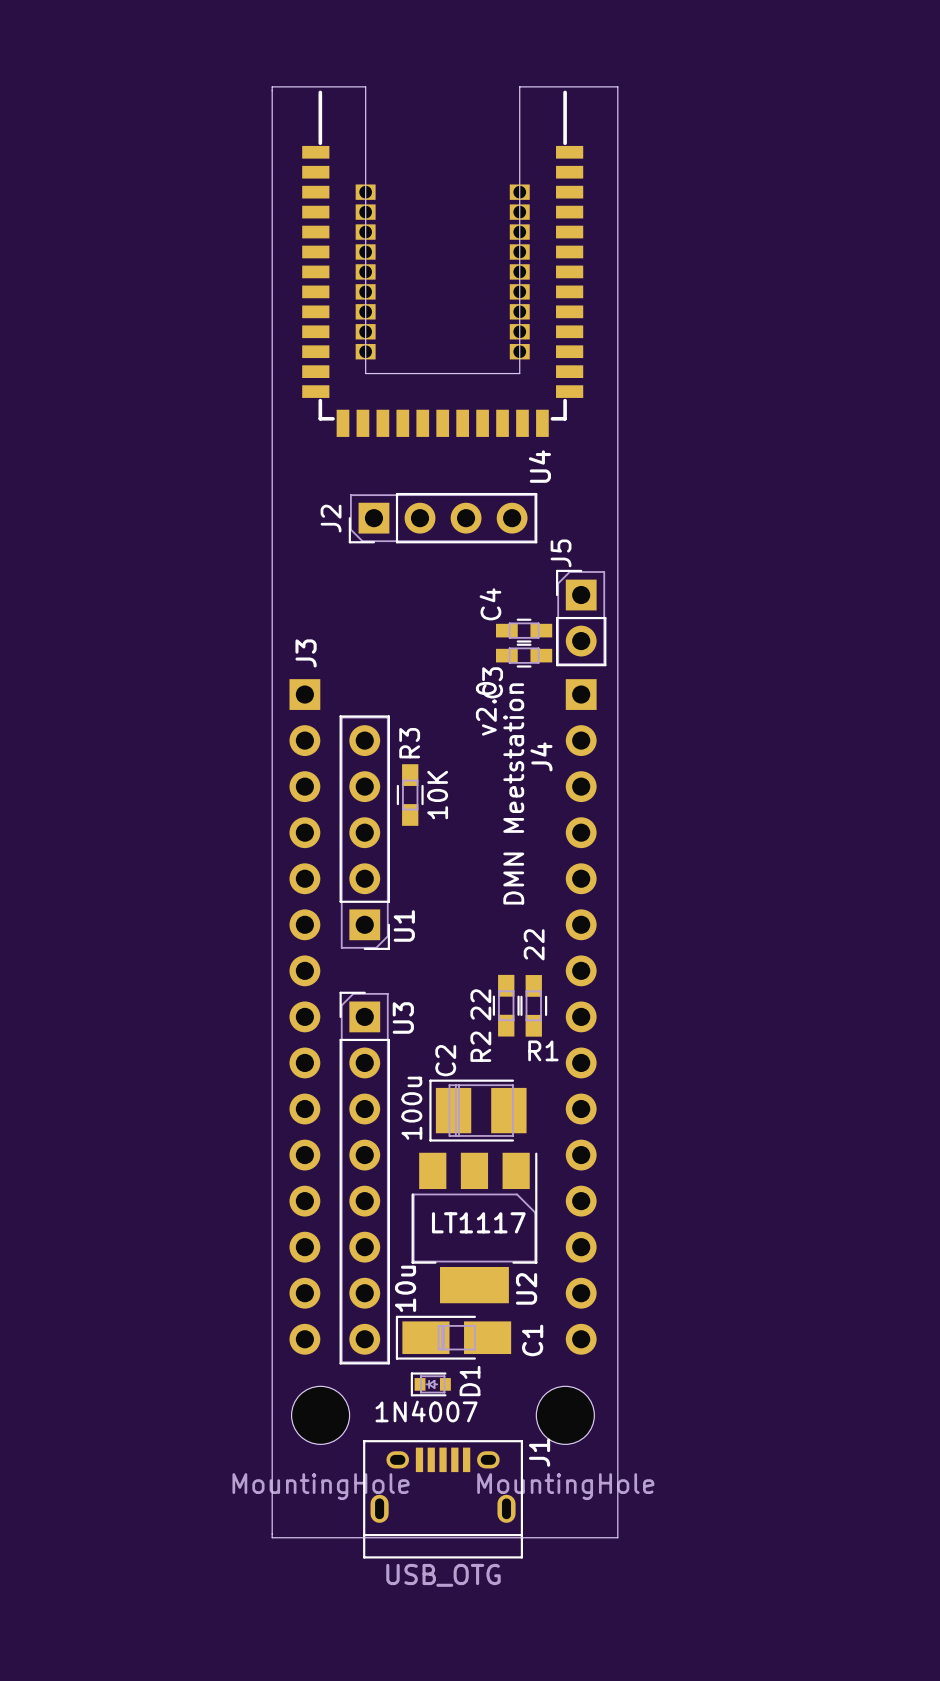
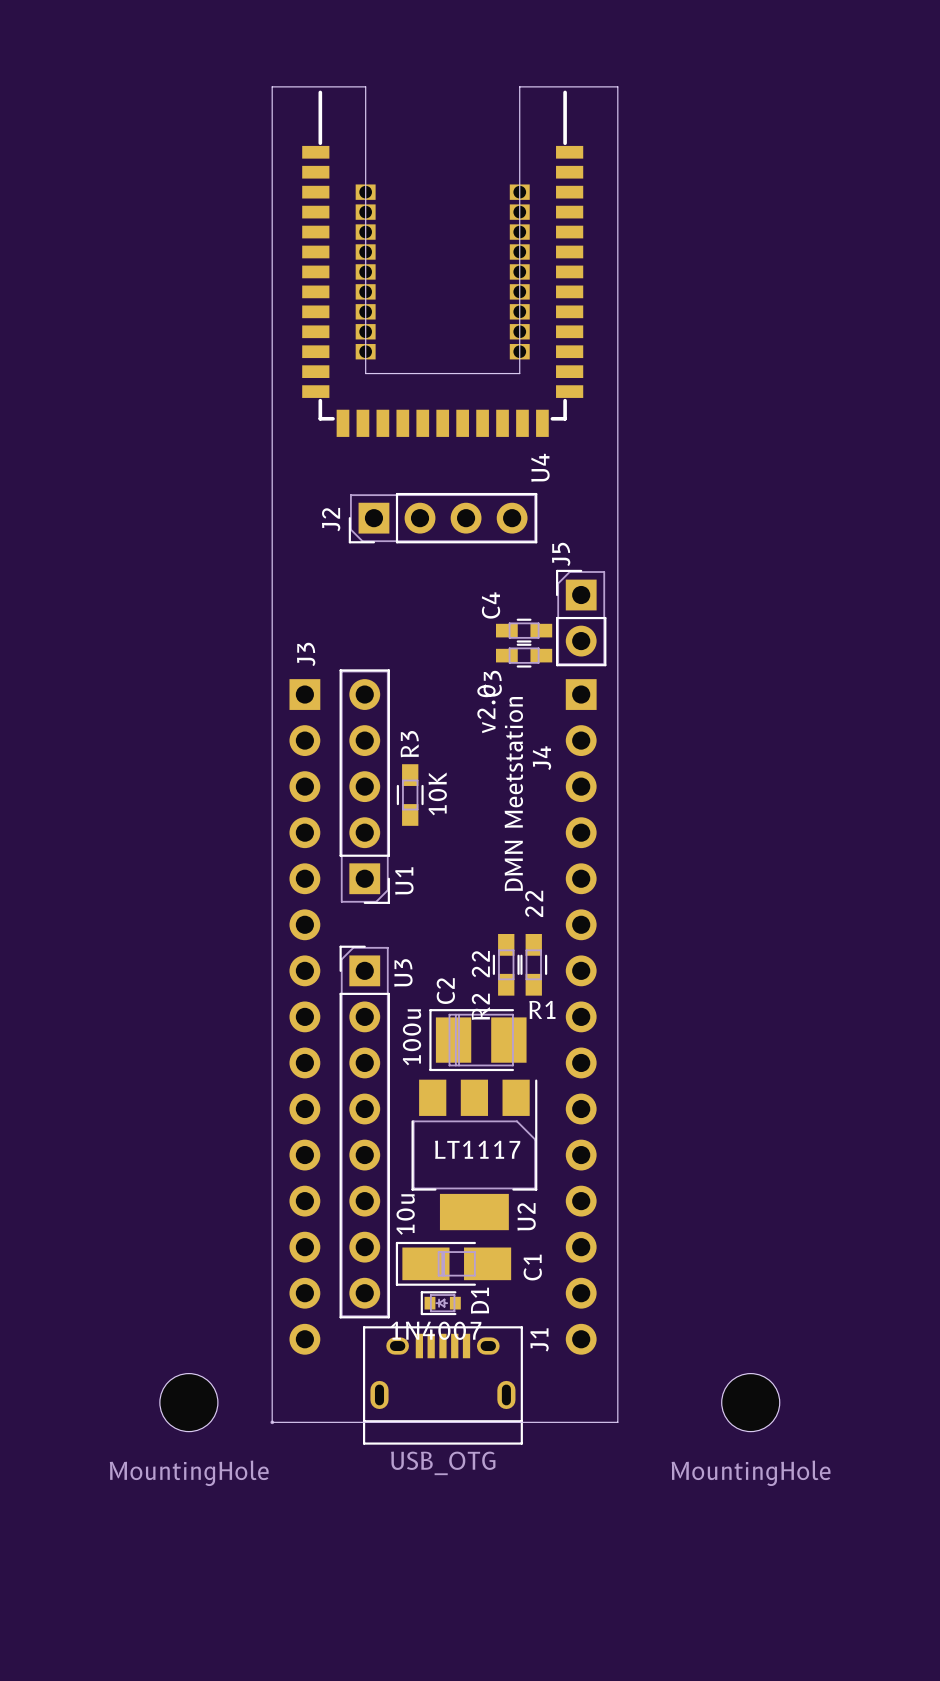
U1 position: (364, 832) -> (364, 786)
R2 position: (506, 1005) -> (506, 964)
R1 position: (533, 1005) -> (533, 964)
C2 position: (477, 1110) -> (477, 1040)
U3 position: (364, 1178) -> (364, 1132)
U2 position: (474, 1227) -> (474, 1154)
C1 position: (453, 1337) -> (453, 1263)
D1 position: (430, 1384) -> (440, 1303)
part position: (320, 1415) -> (188, 1402)
part position: (565, 1415) -> (750, 1402)
board edge: (272, 1422) (272, 1537) (617, 1537) (617, 1422) -> (272, 1422) (617, 1422)
J1 position: (443, 1499) -> (442, 1385)

